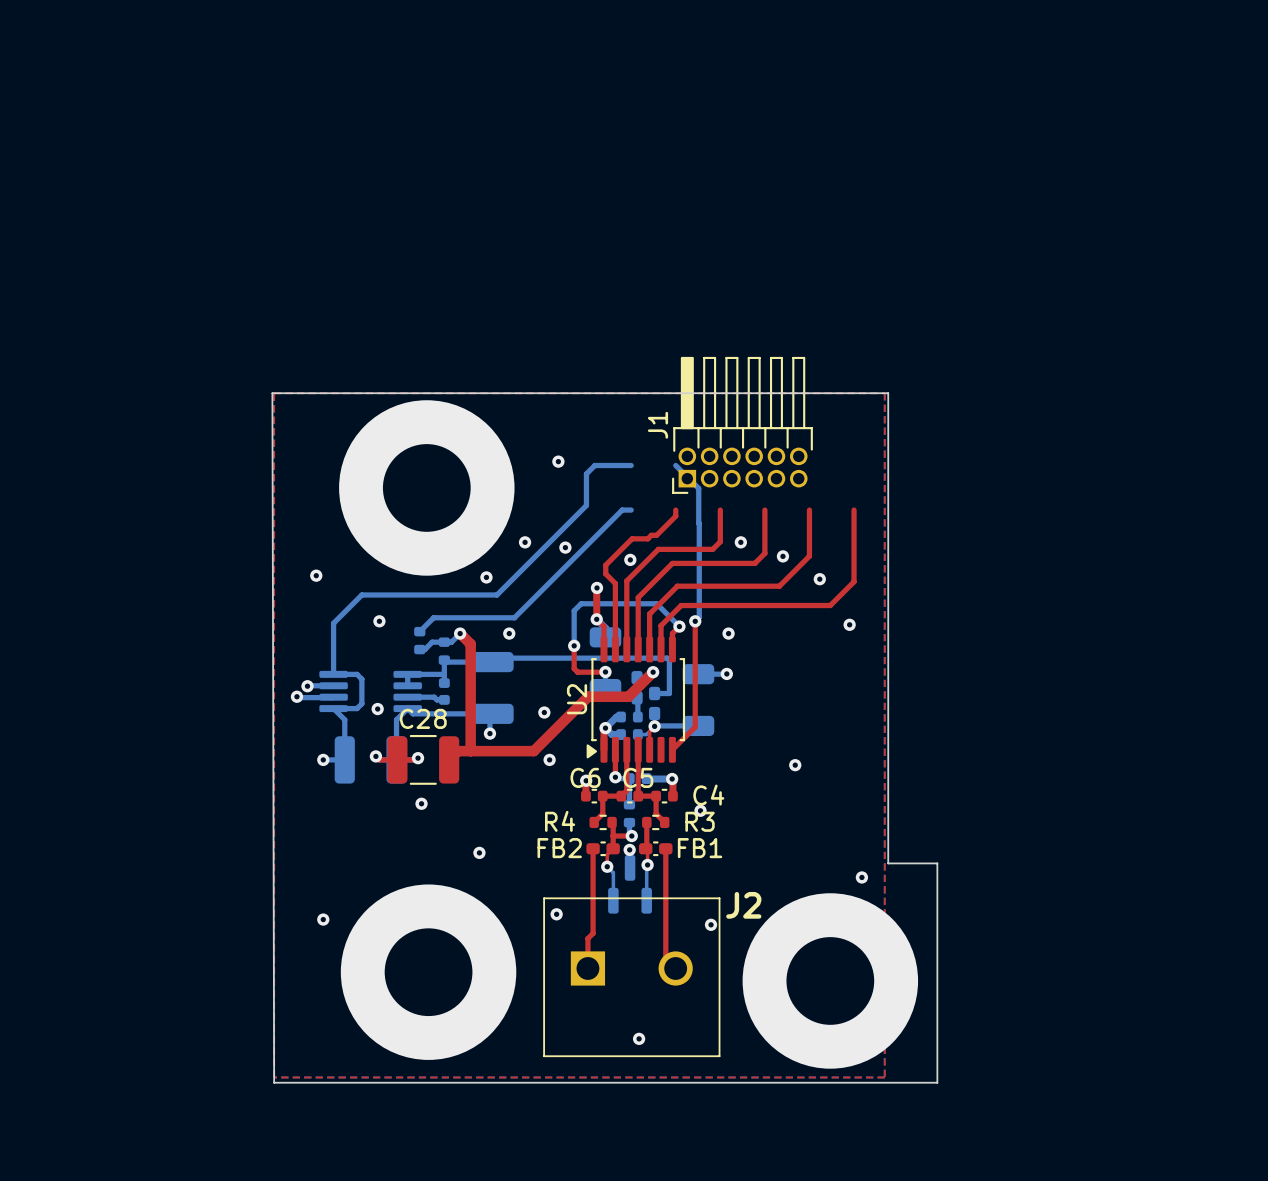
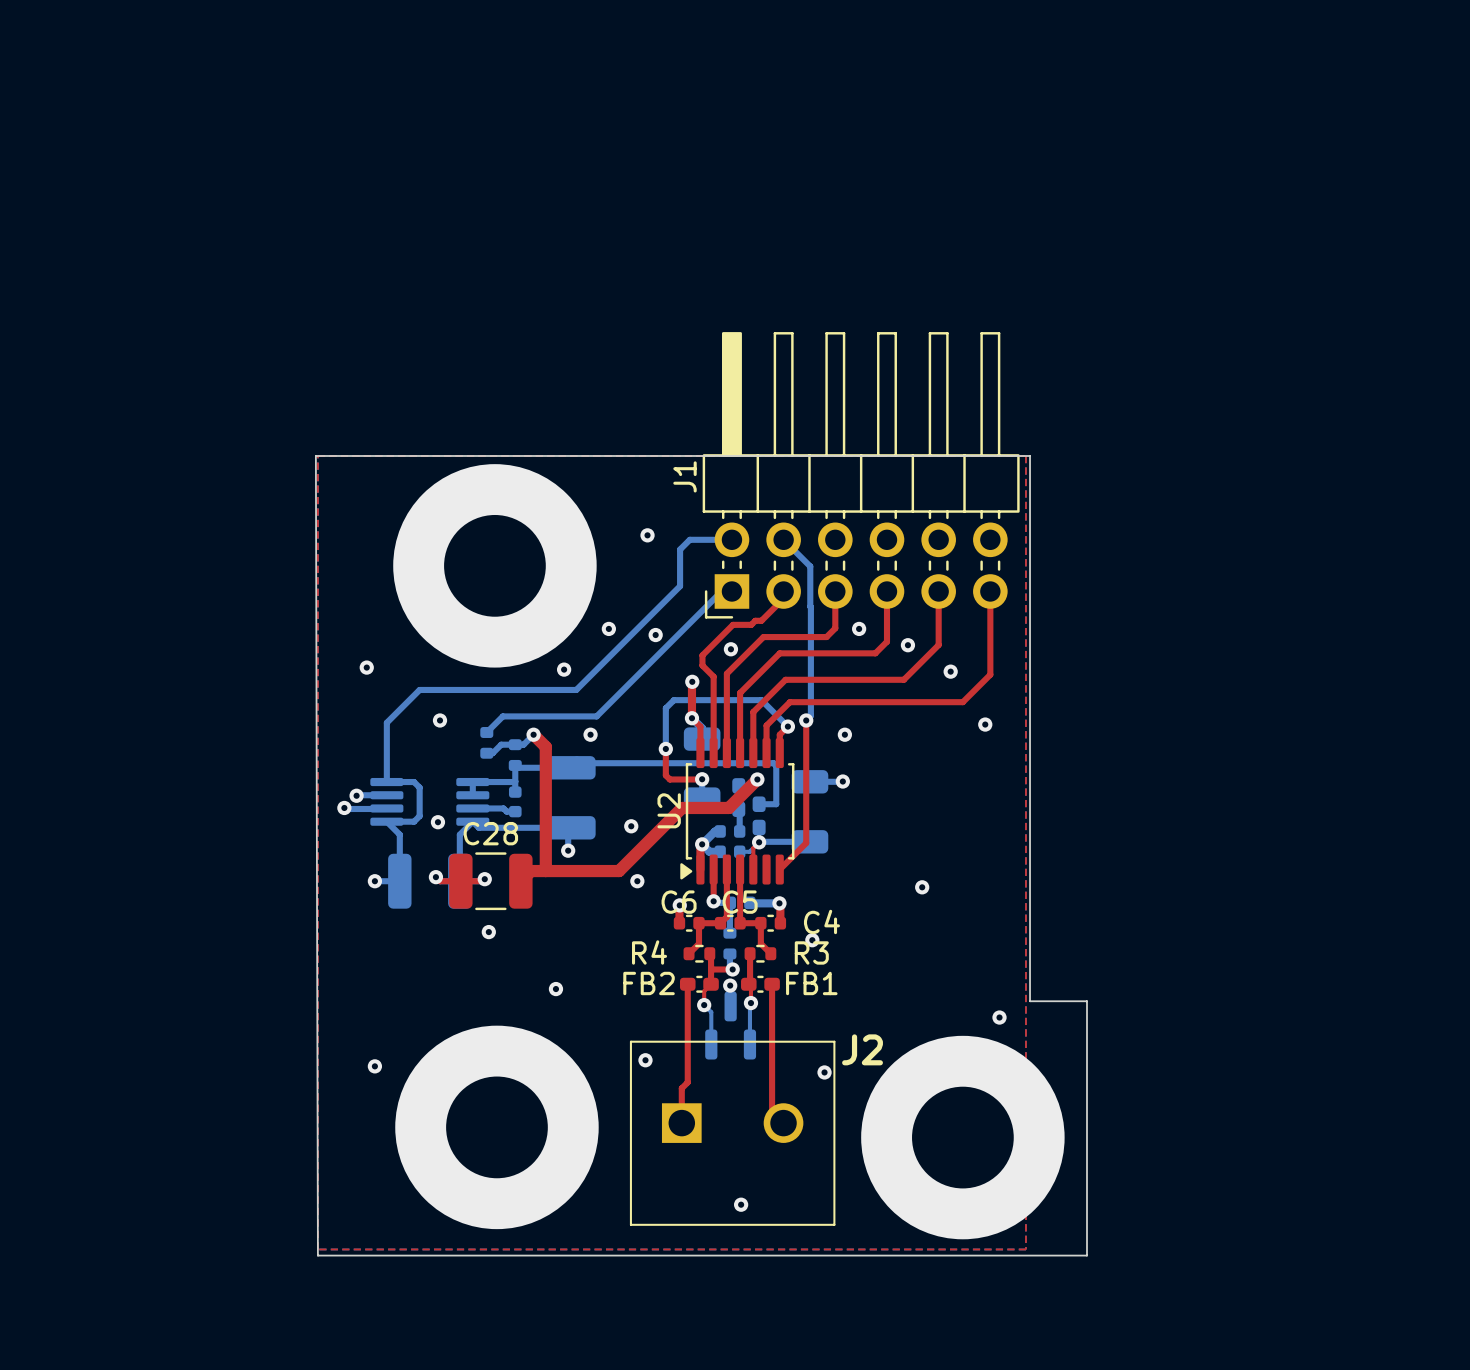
J1 footprint: [672, 356, 813, 494] -> [702, 332, 1020, 619]
J1 name position: J1 (658, 425) -> J1 (685, 476)

